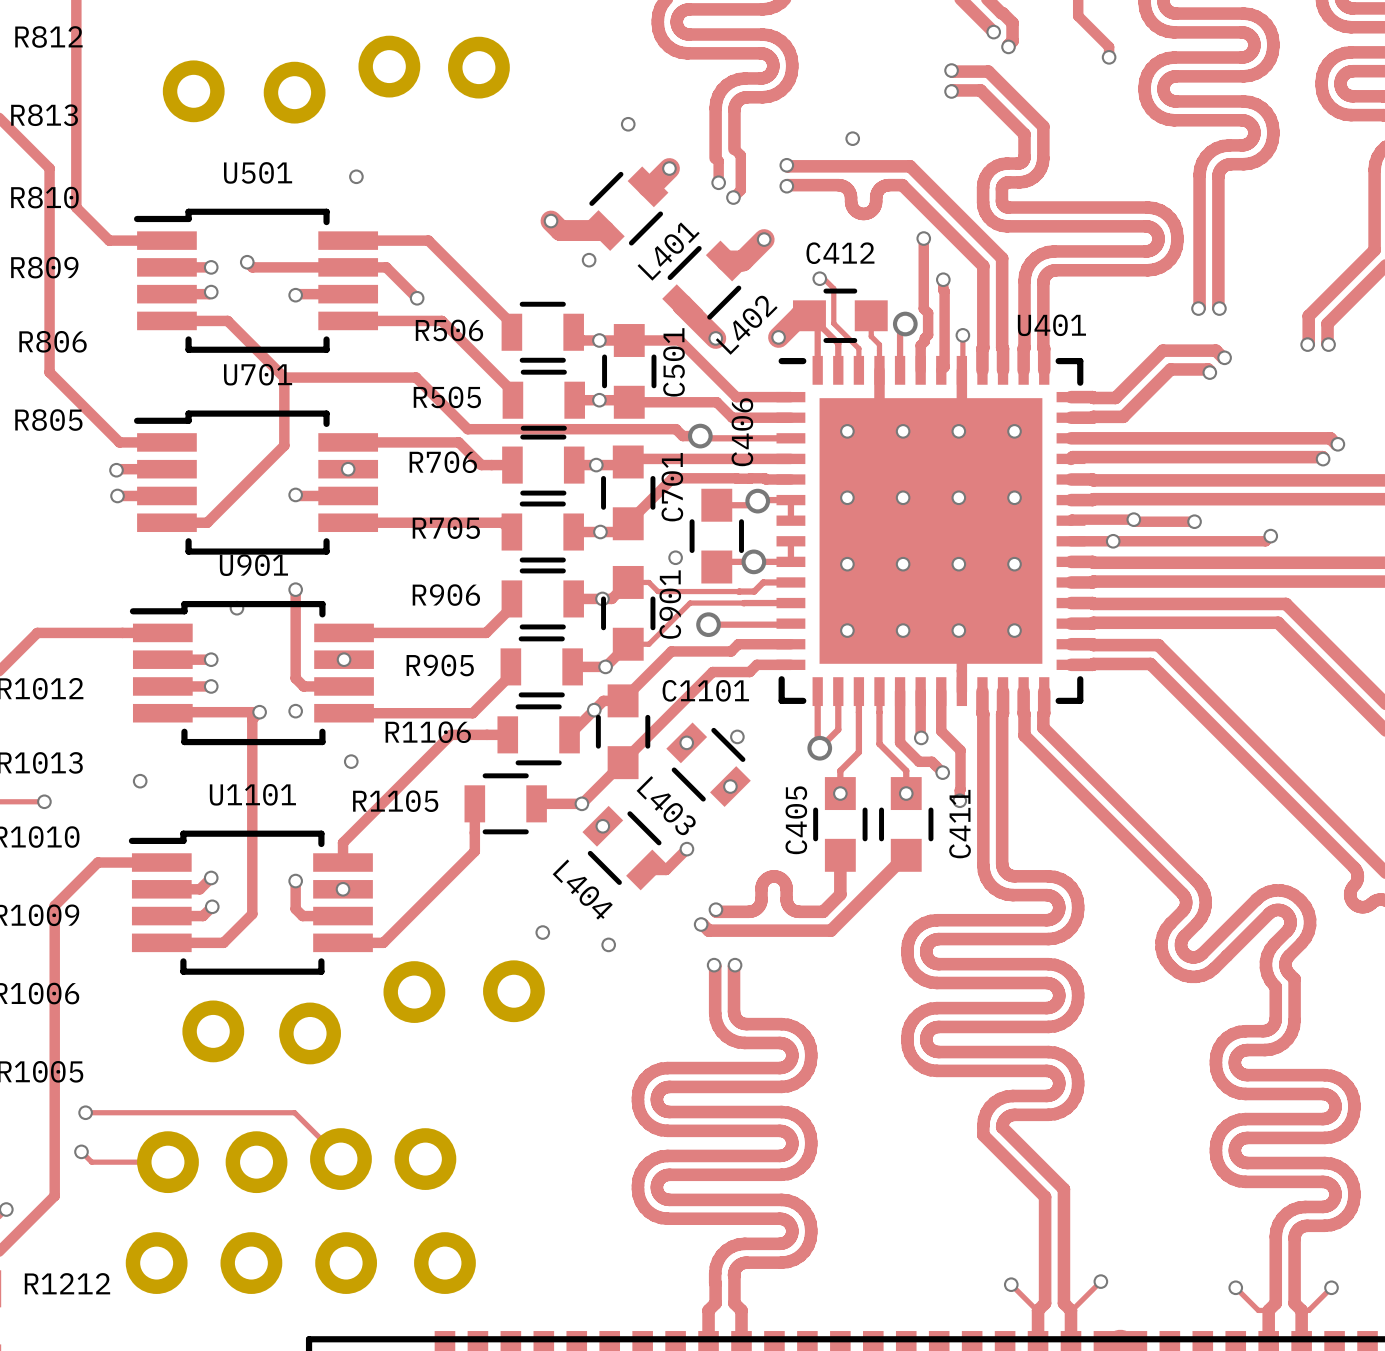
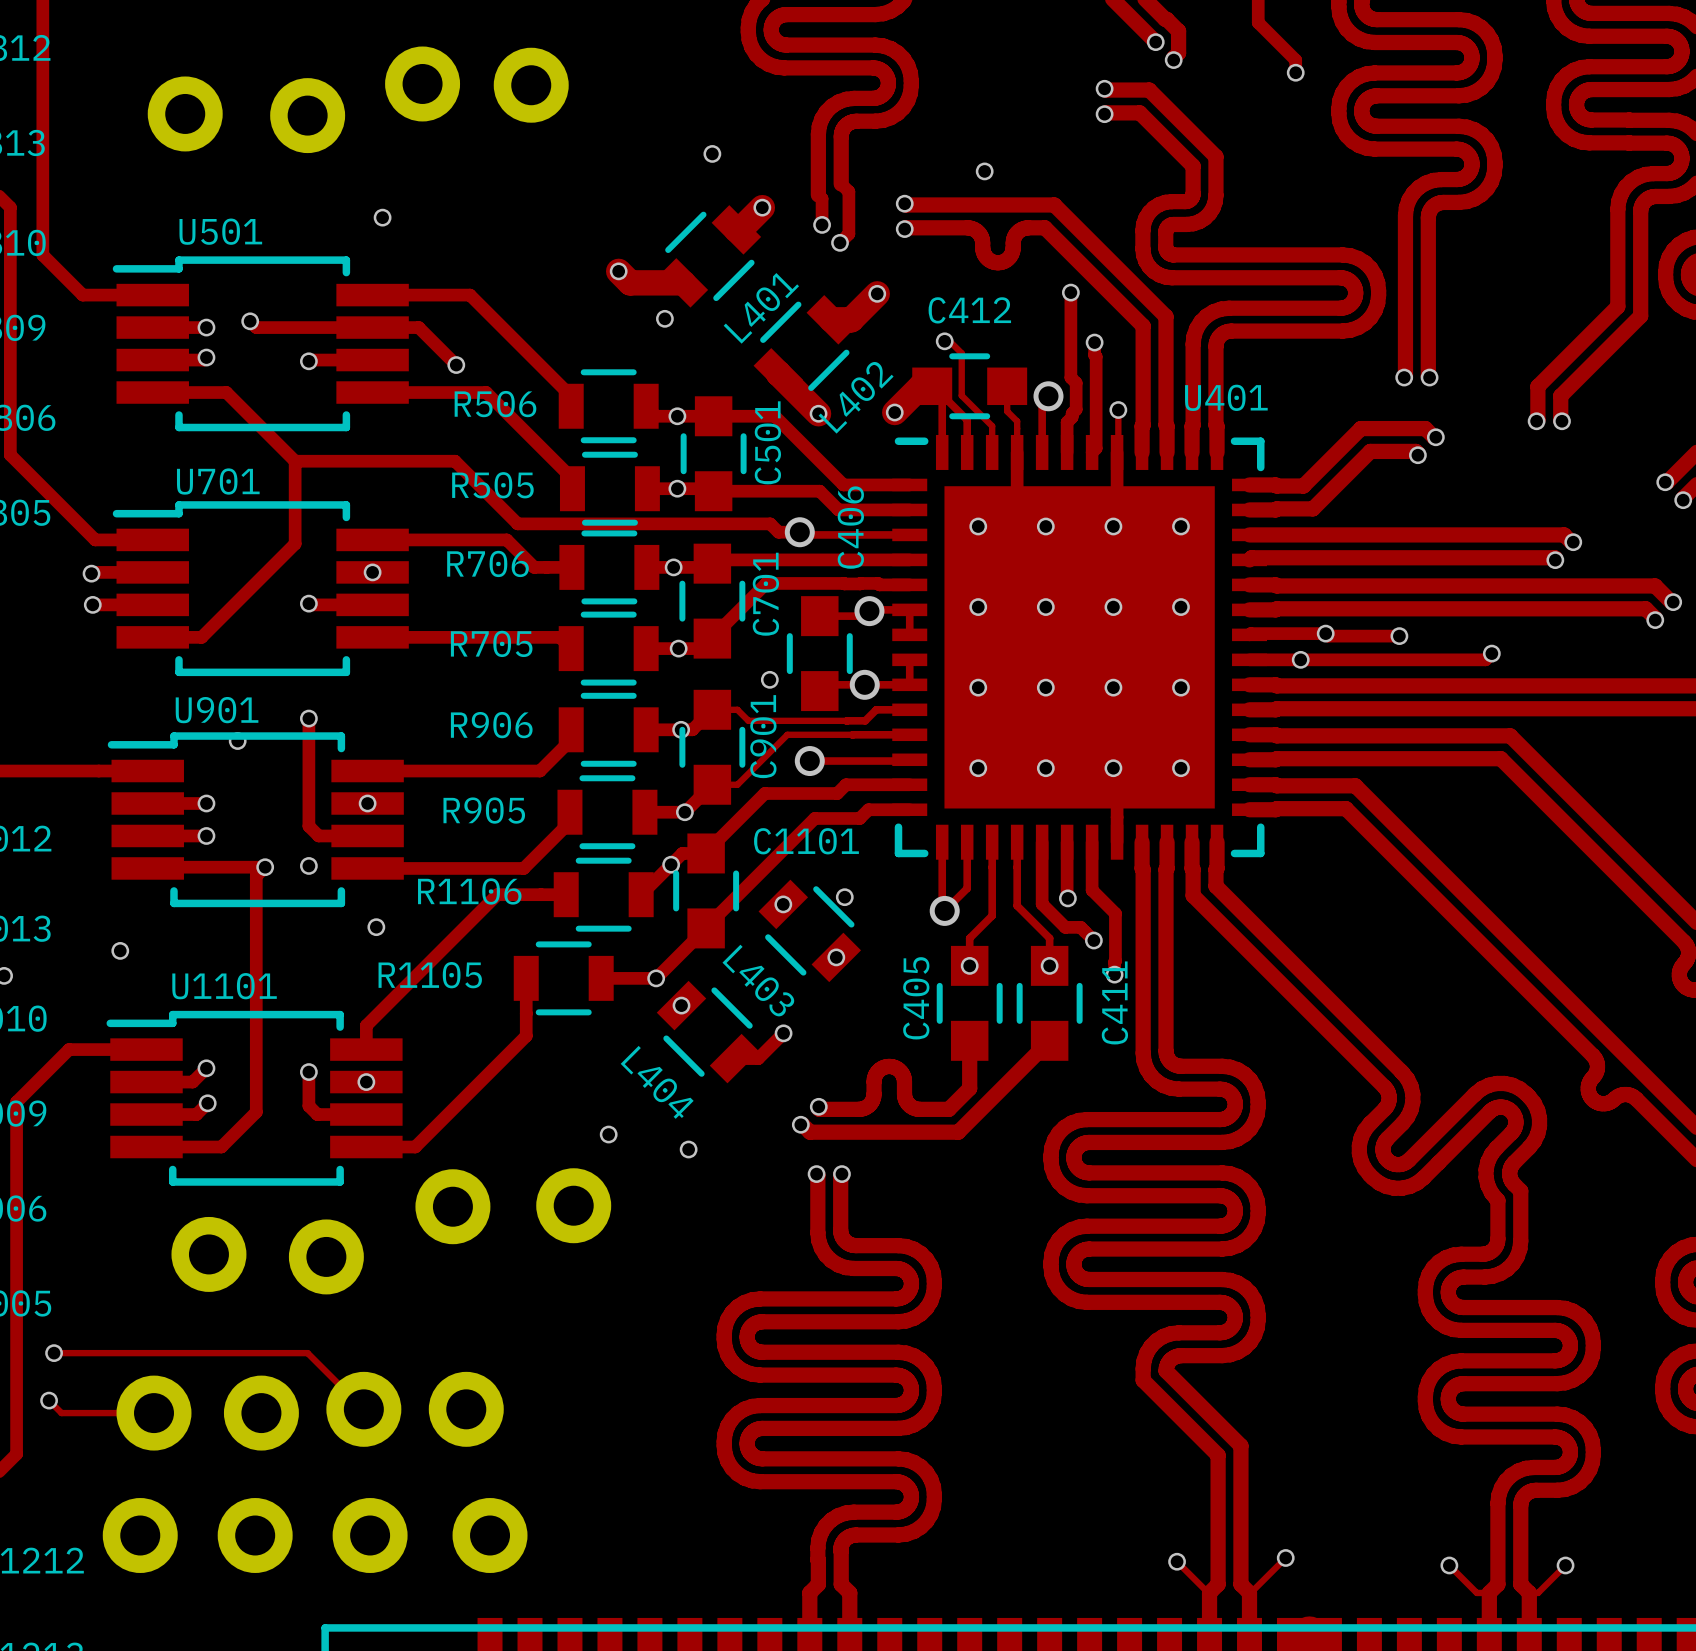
U501 name position: U501 (258, 172) -> U501 (220, 231)
U701 name position: U701 (258, 374) -> U701 (218, 481)
U901 name position: U901 (253, 565) -> U901 (217, 710)
U1101 name position: U1101 (252, 794) -> U1101 (224, 986)

